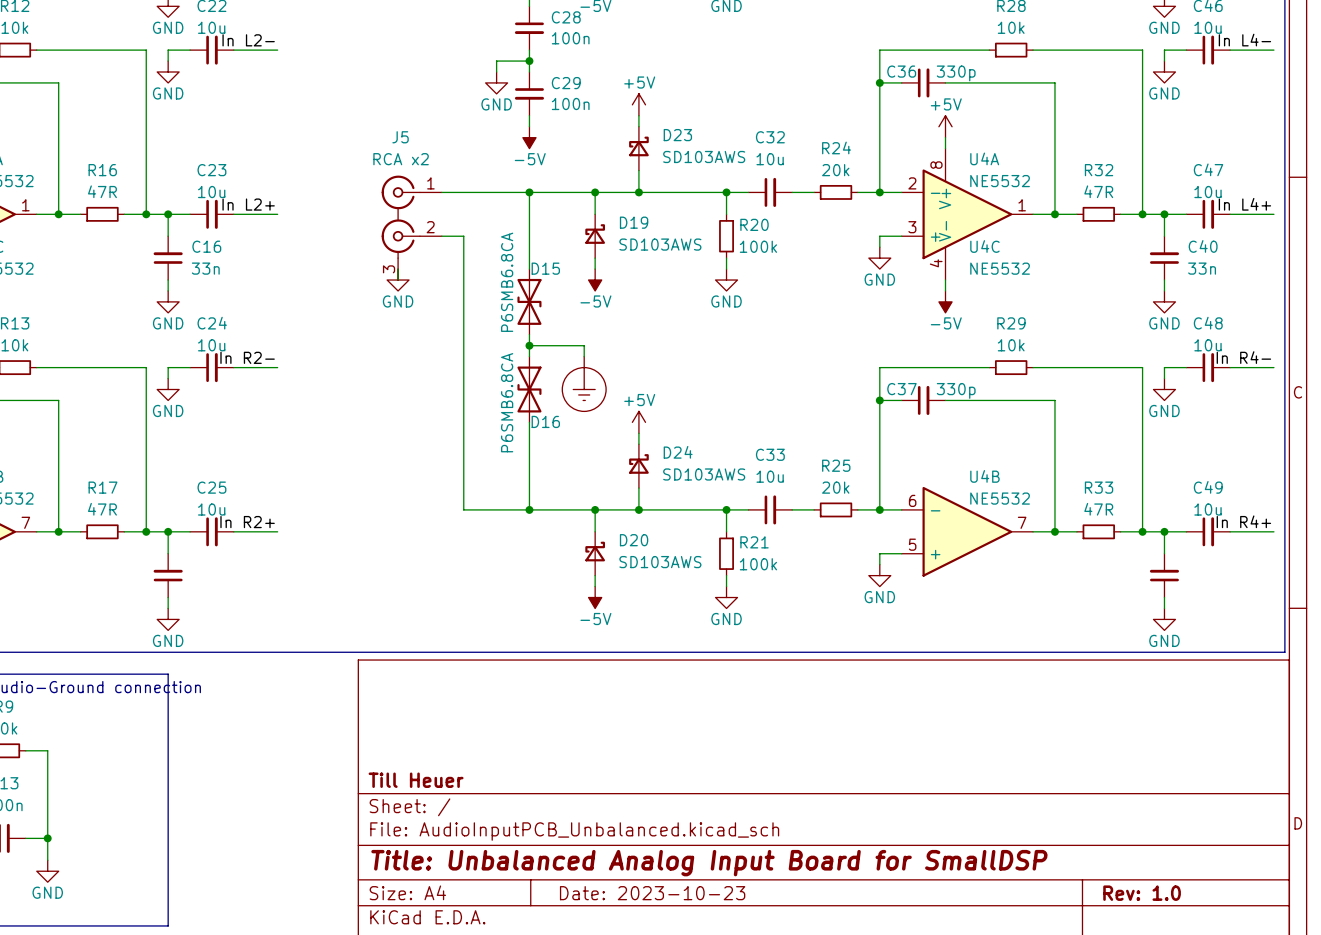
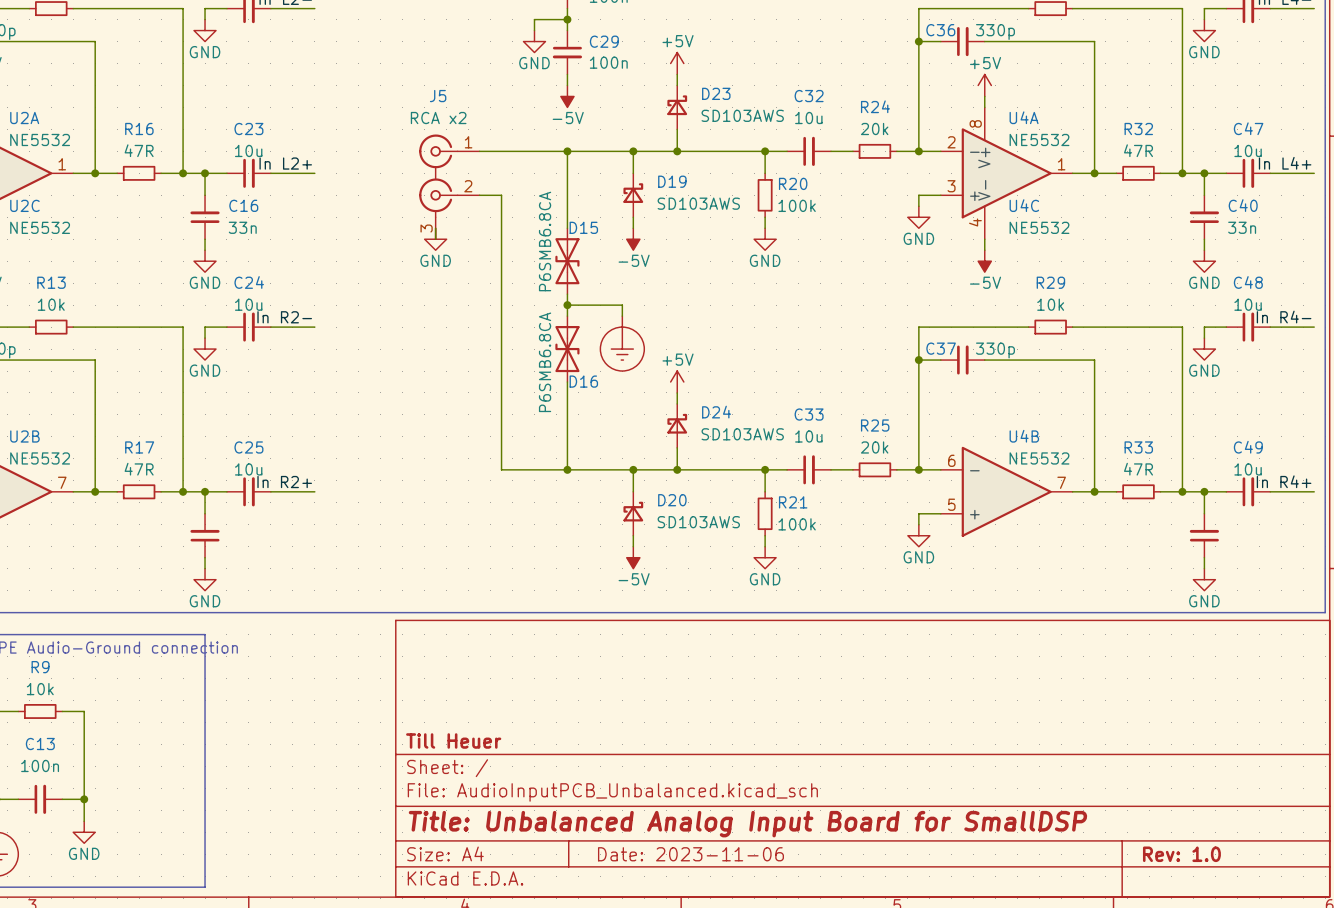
title block: Date: 2023-10-23 (652, 893) -> Date: 2023-11-06 (690, 854)

